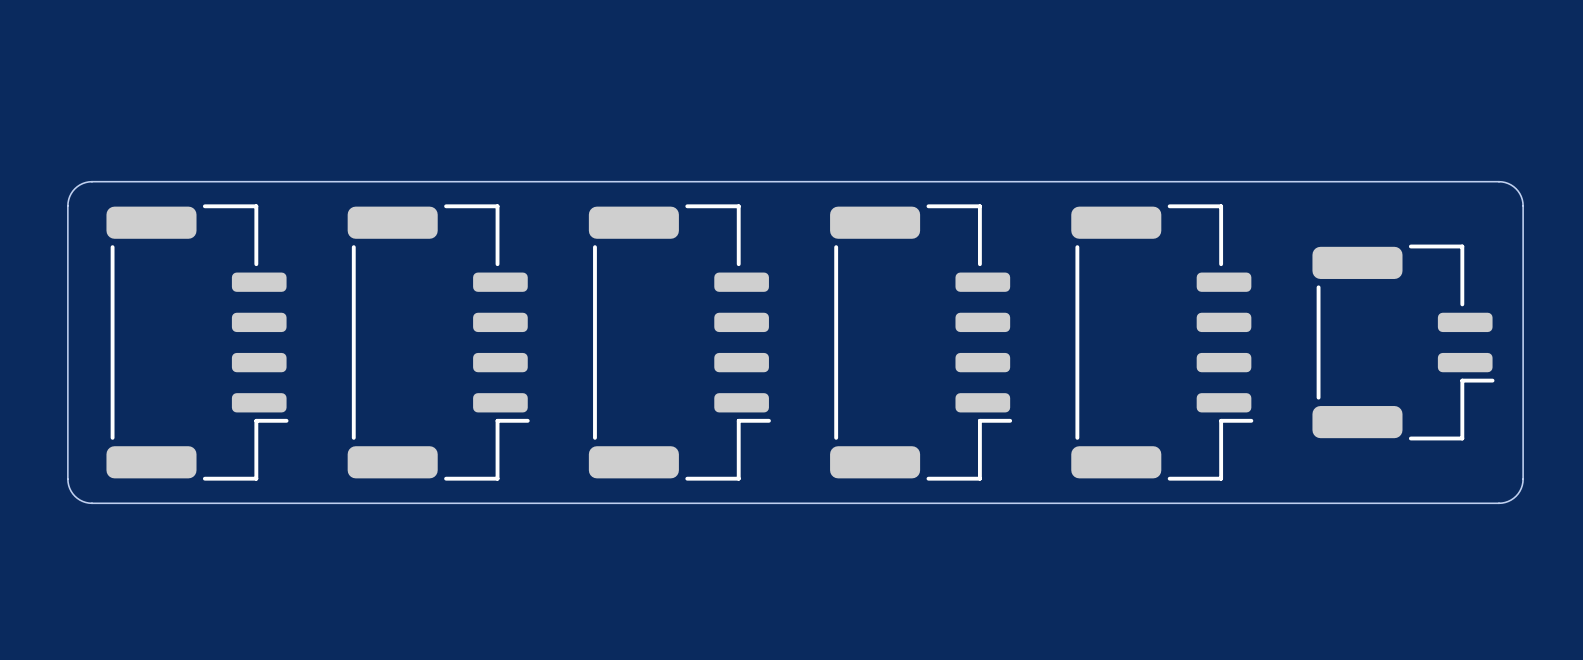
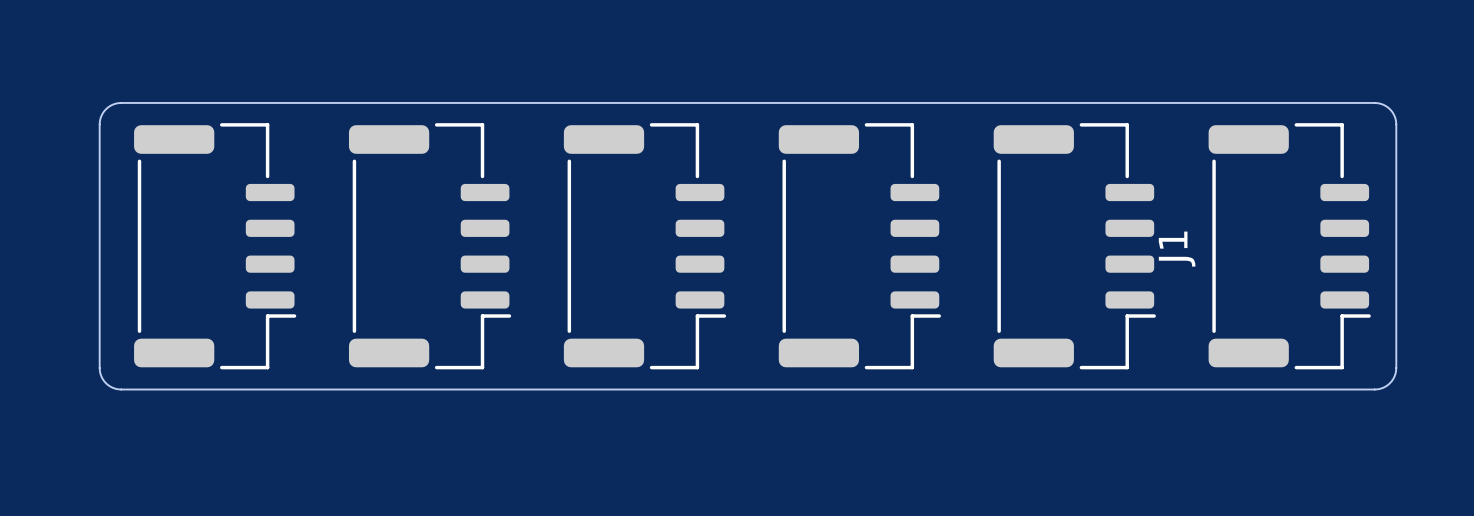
part: (1403, 342) -> none
J1: none -> (1289, 246)

